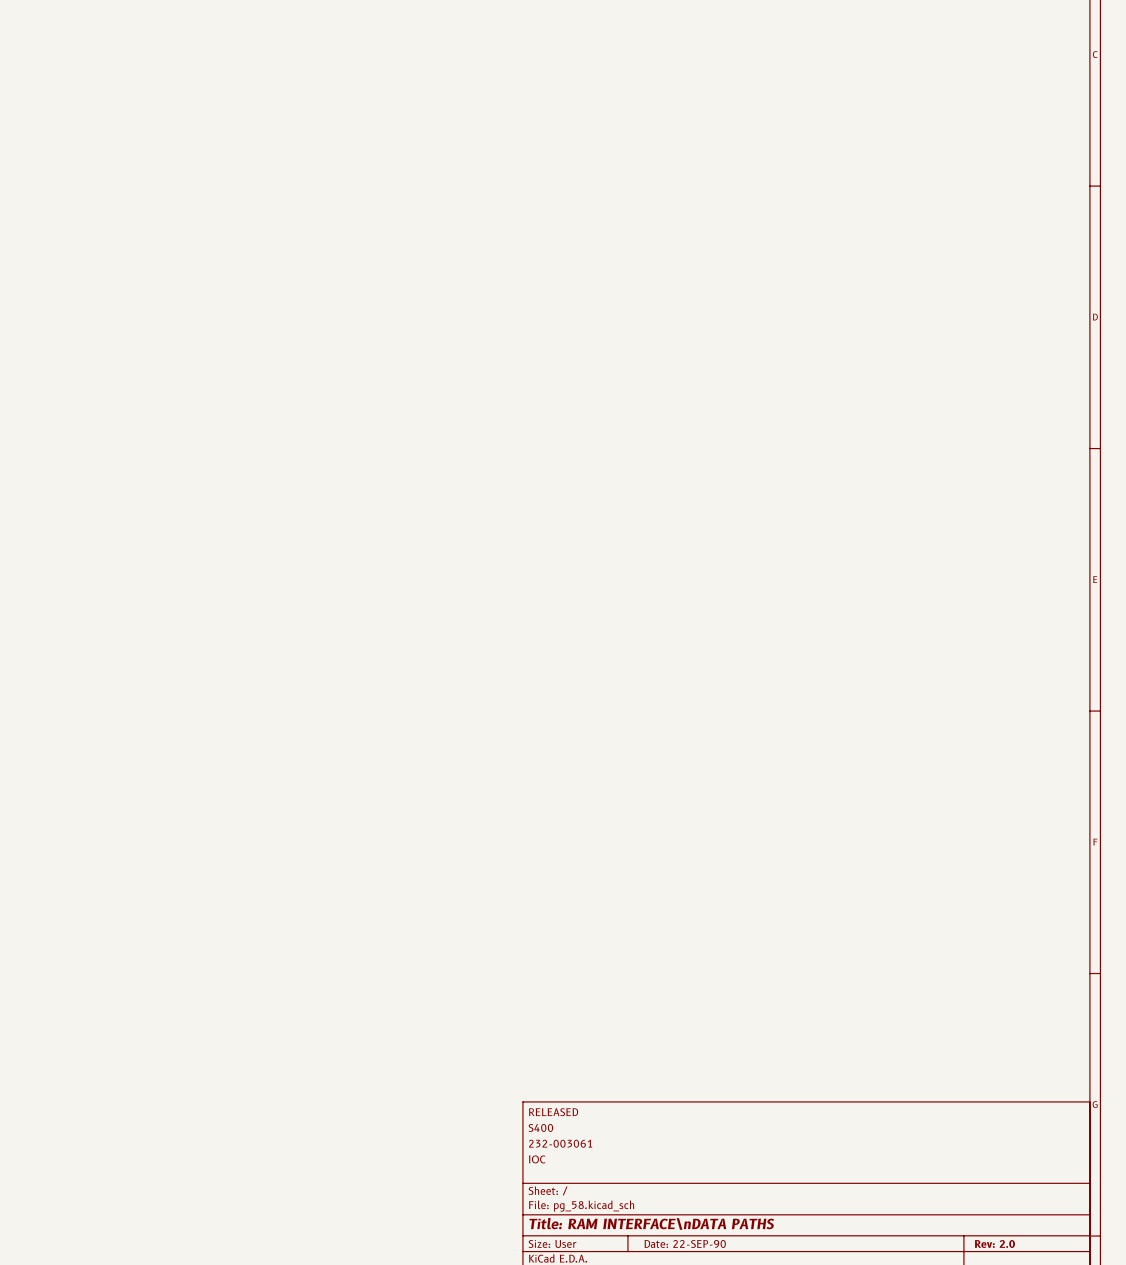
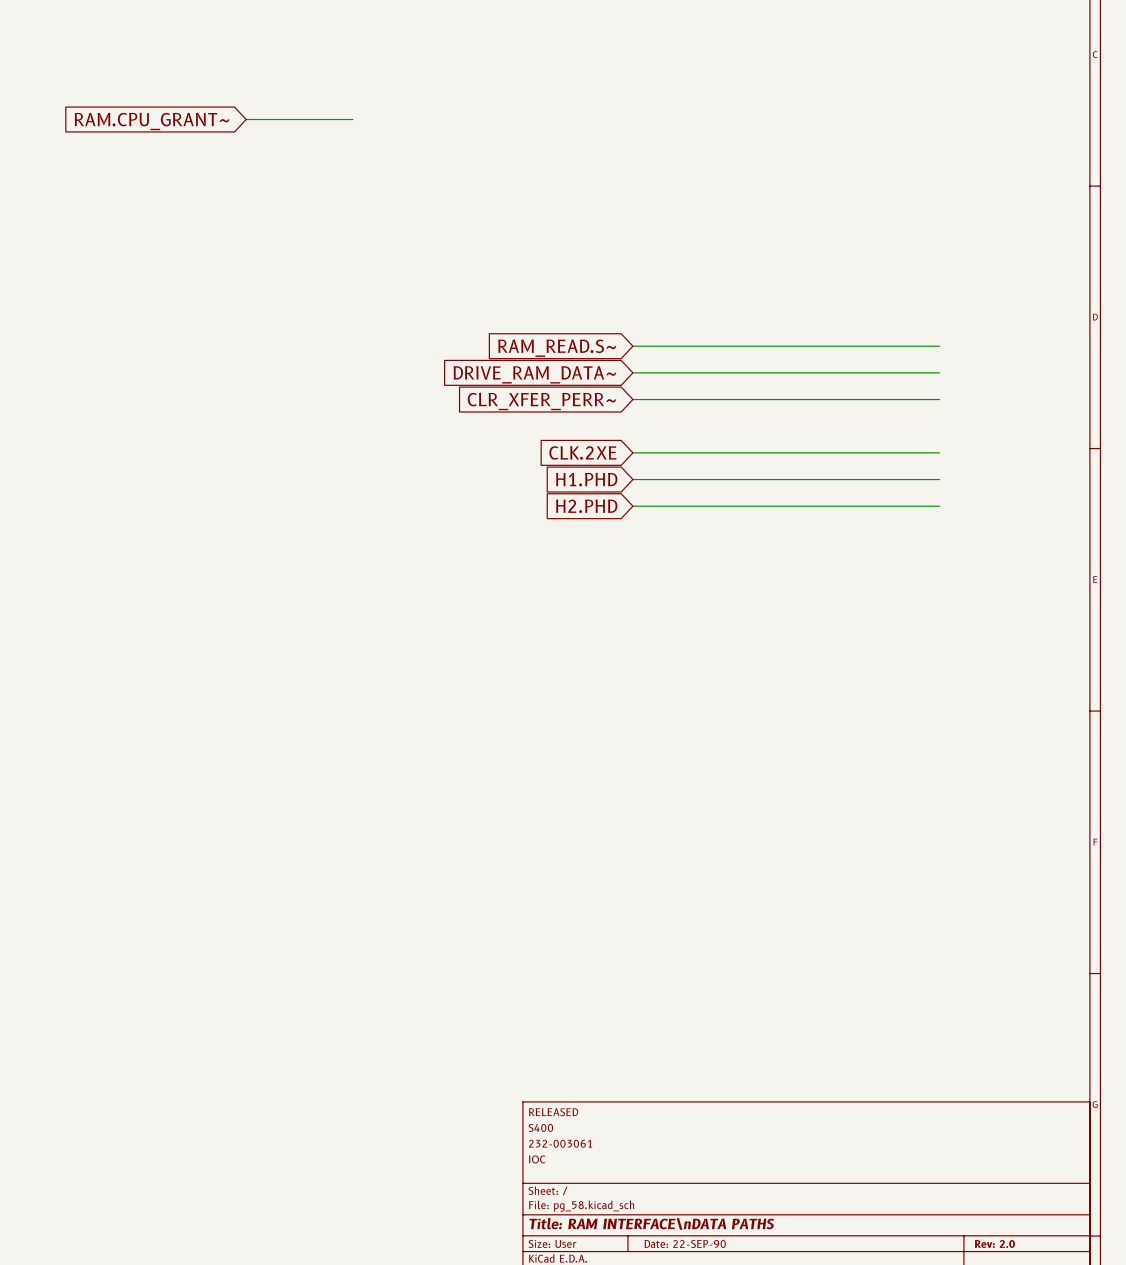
wire: none -> (246, 119) (352, 119)
global label: none -> RAM.CPU_GRANT~ (152, 121)
wire: none -> (632, 346) (939, 346)
global label: none -> RAM_READ.S~ (557, 348)
wire: none -> (632, 372) (939, 372)
global label: none -> DRIVE_RAM_DATA~ (534, 374)
wire: none -> (632, 399) (939, 399)
global label: none -> CLR_XFER_PERR~ (541, 401)
global label: none -> CLK.2XE (582, 452)
wire: none -> (632, 452) (939, 452)
global label: none -> H1.PHD (586, 479)
wire: none -> (632, 479) (939, 479)
global label: none -> H2.PHD (586, 506)
wire: none -> (632, 506) (939, 506)

